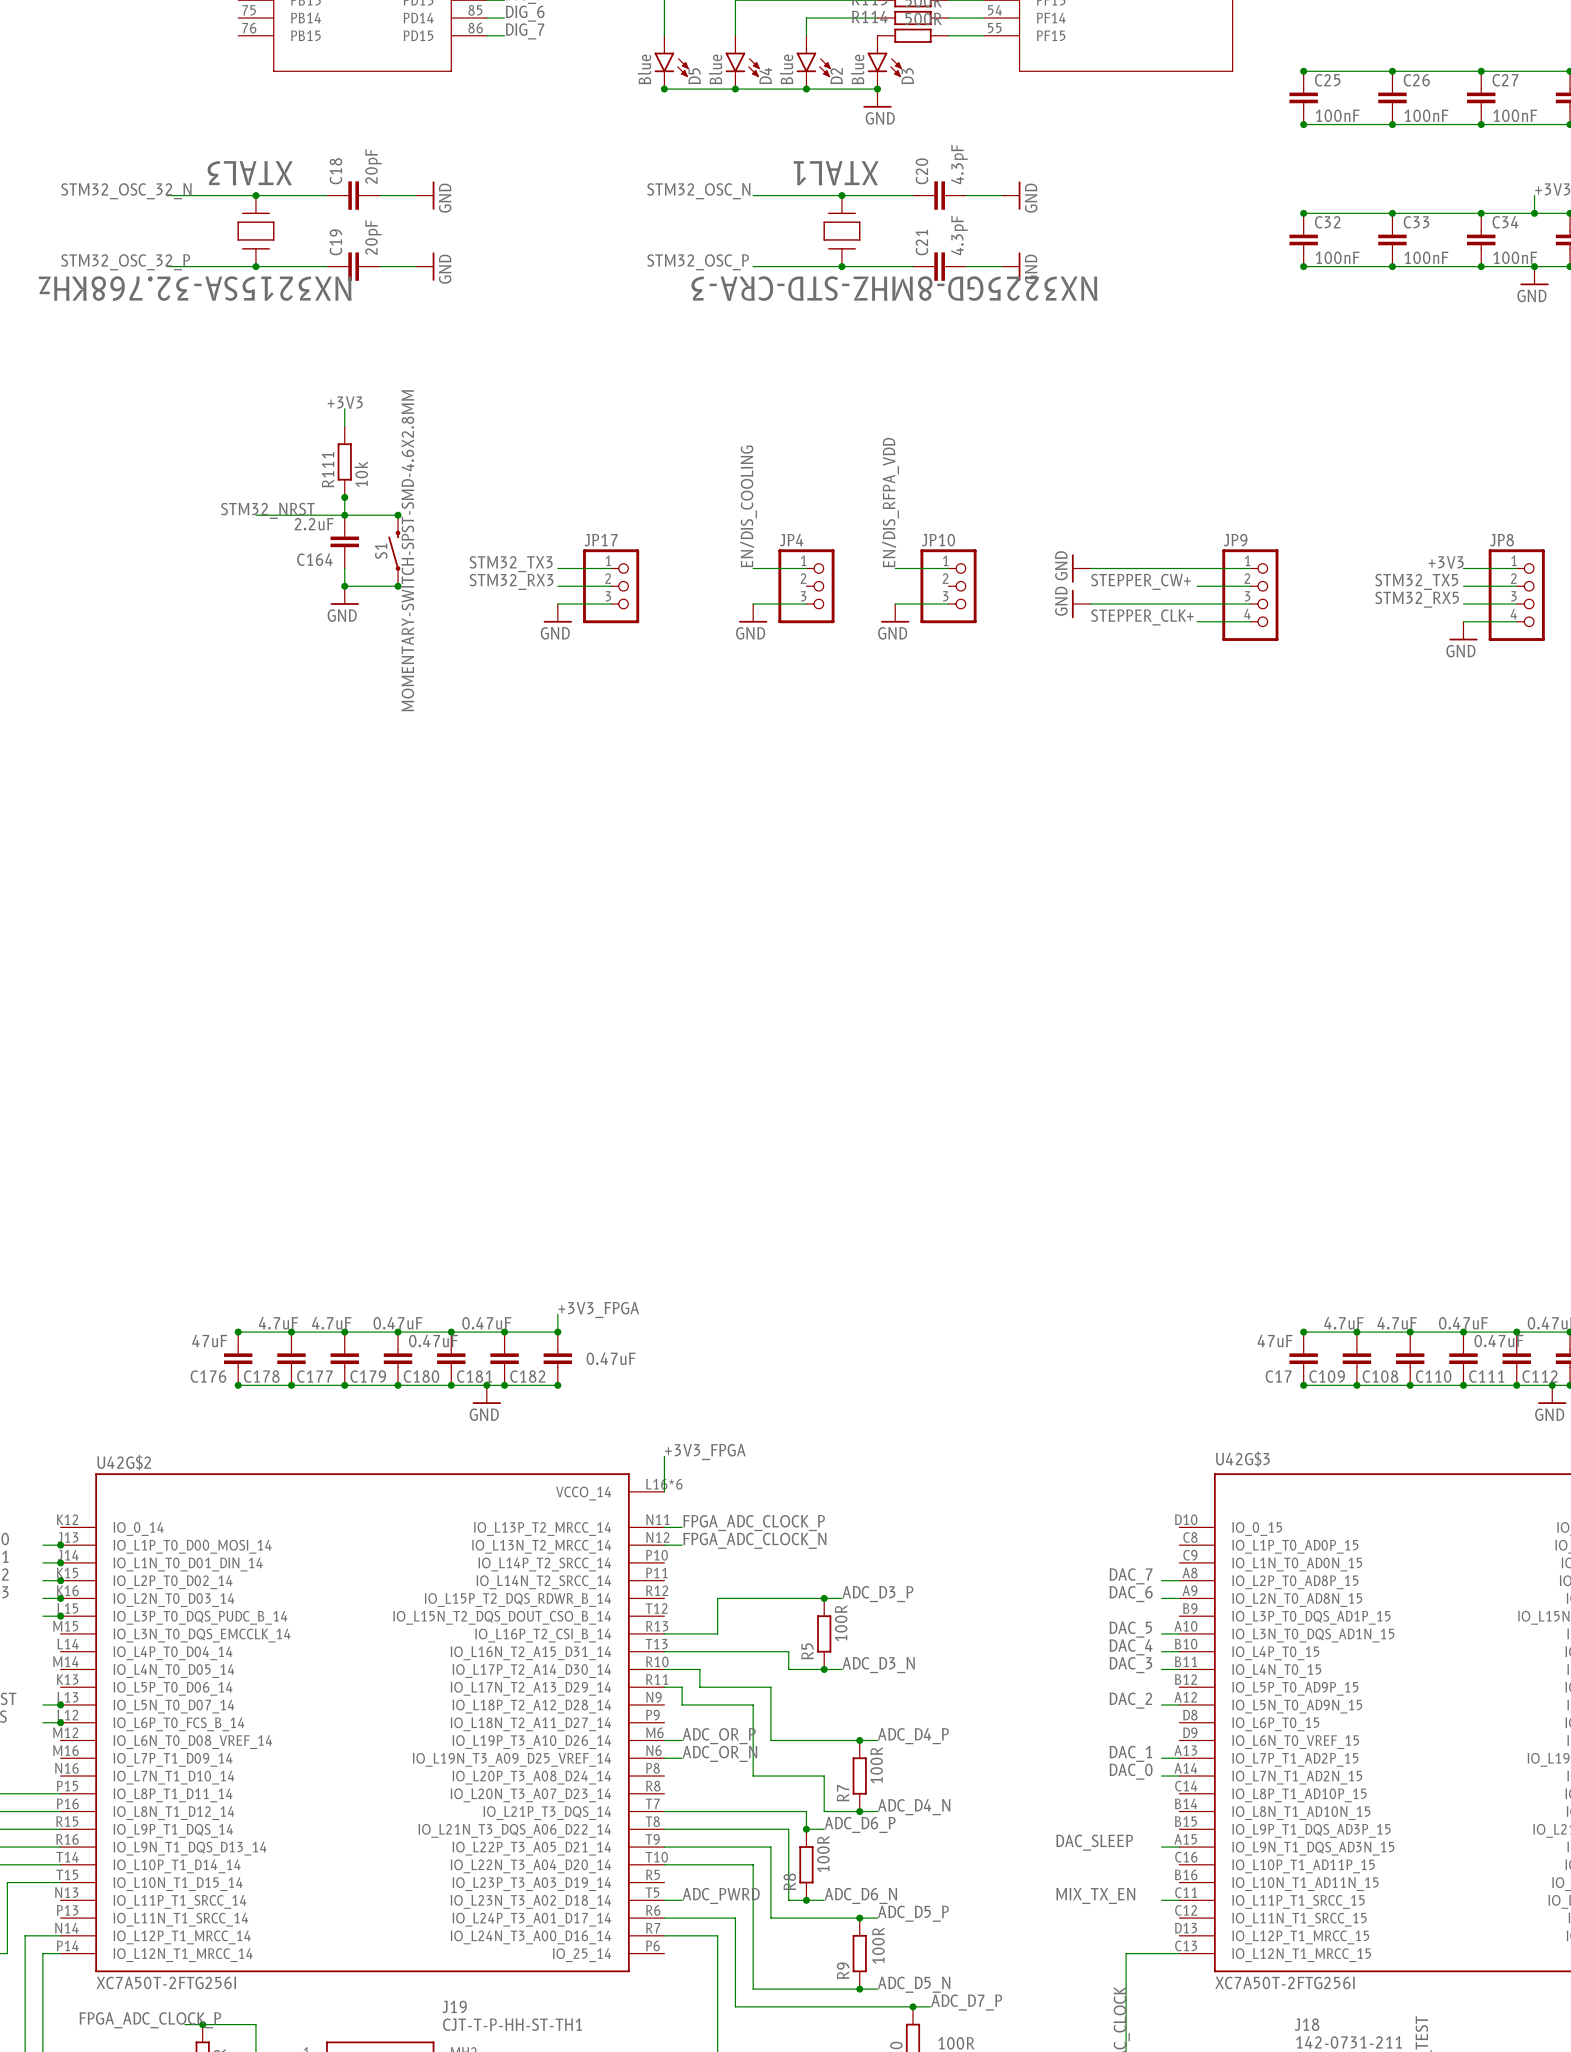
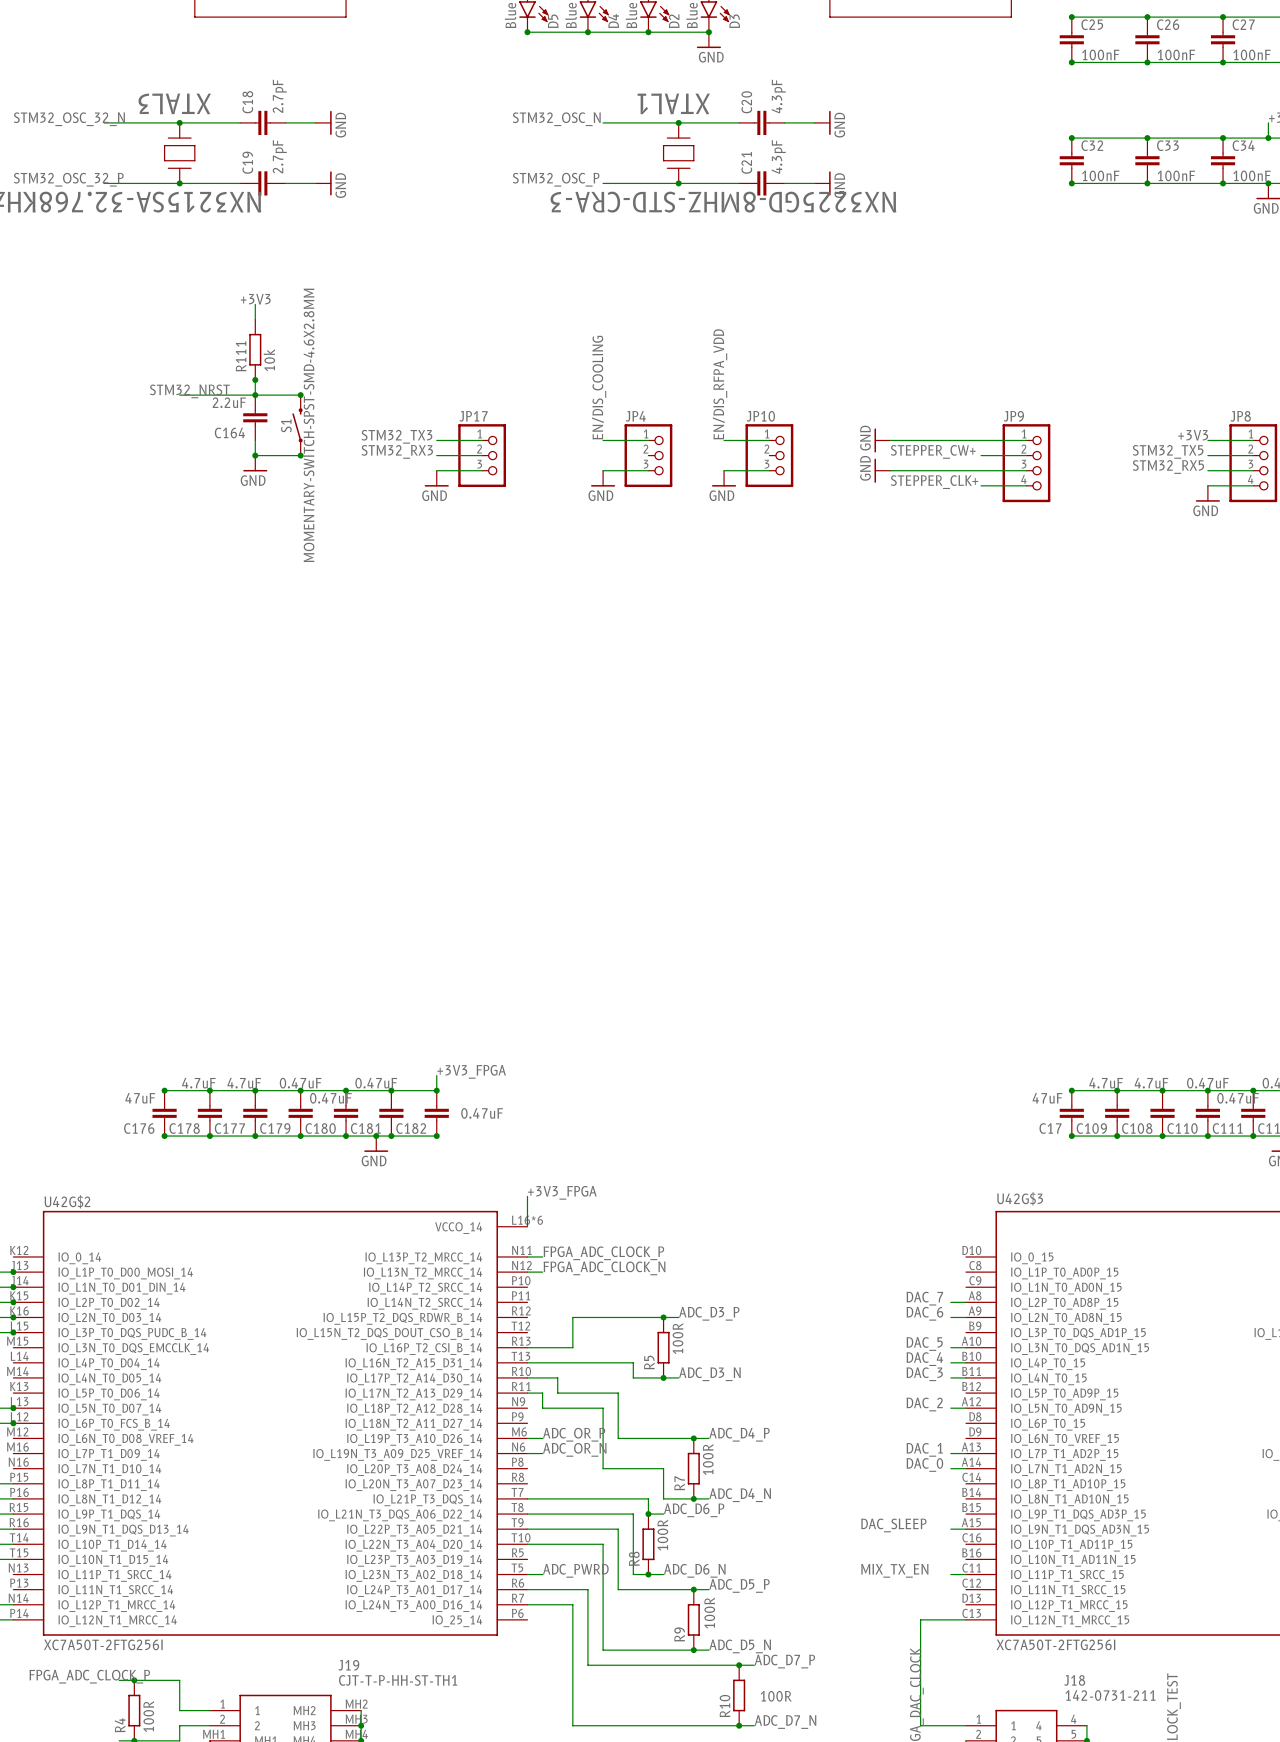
C18 value: 20pF (373, 166) -> 2.7pF (279, 96)
C19 value: 20pF (373, 237) -> 2.7pF (279, 156)

